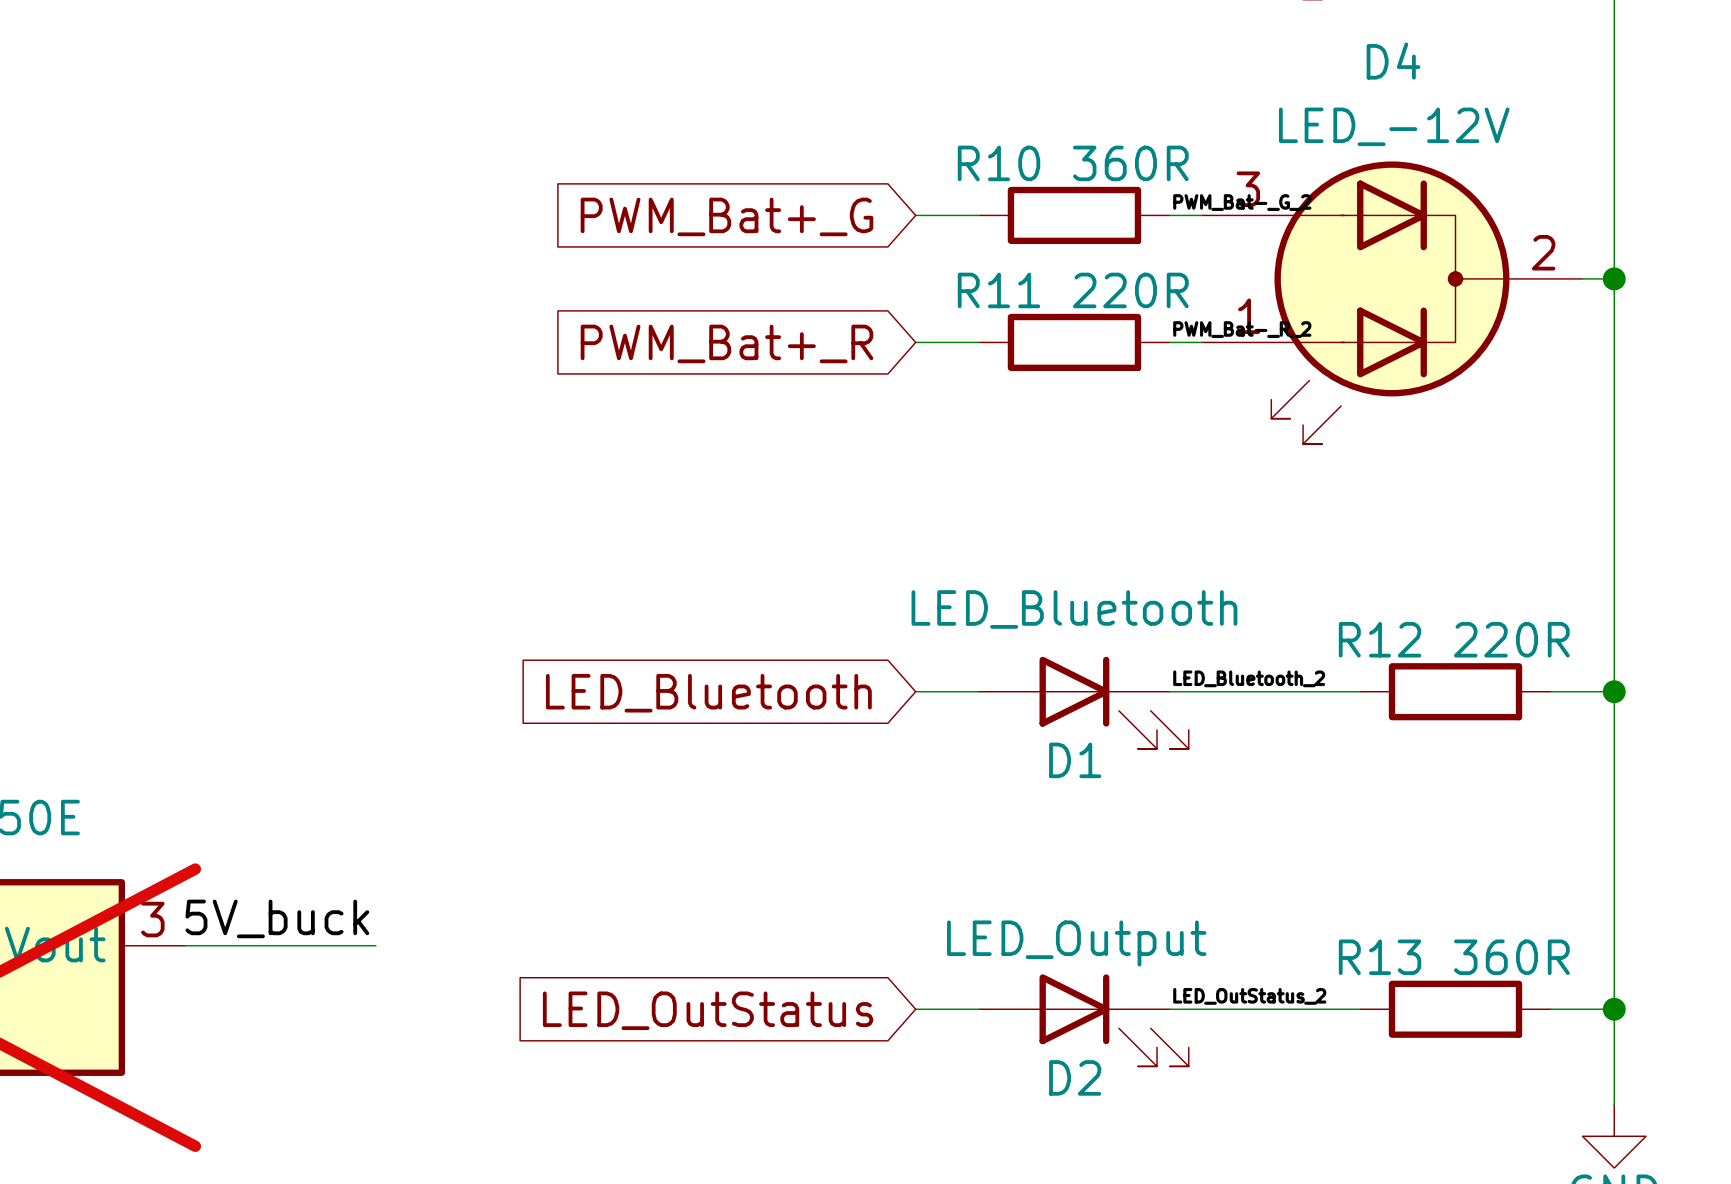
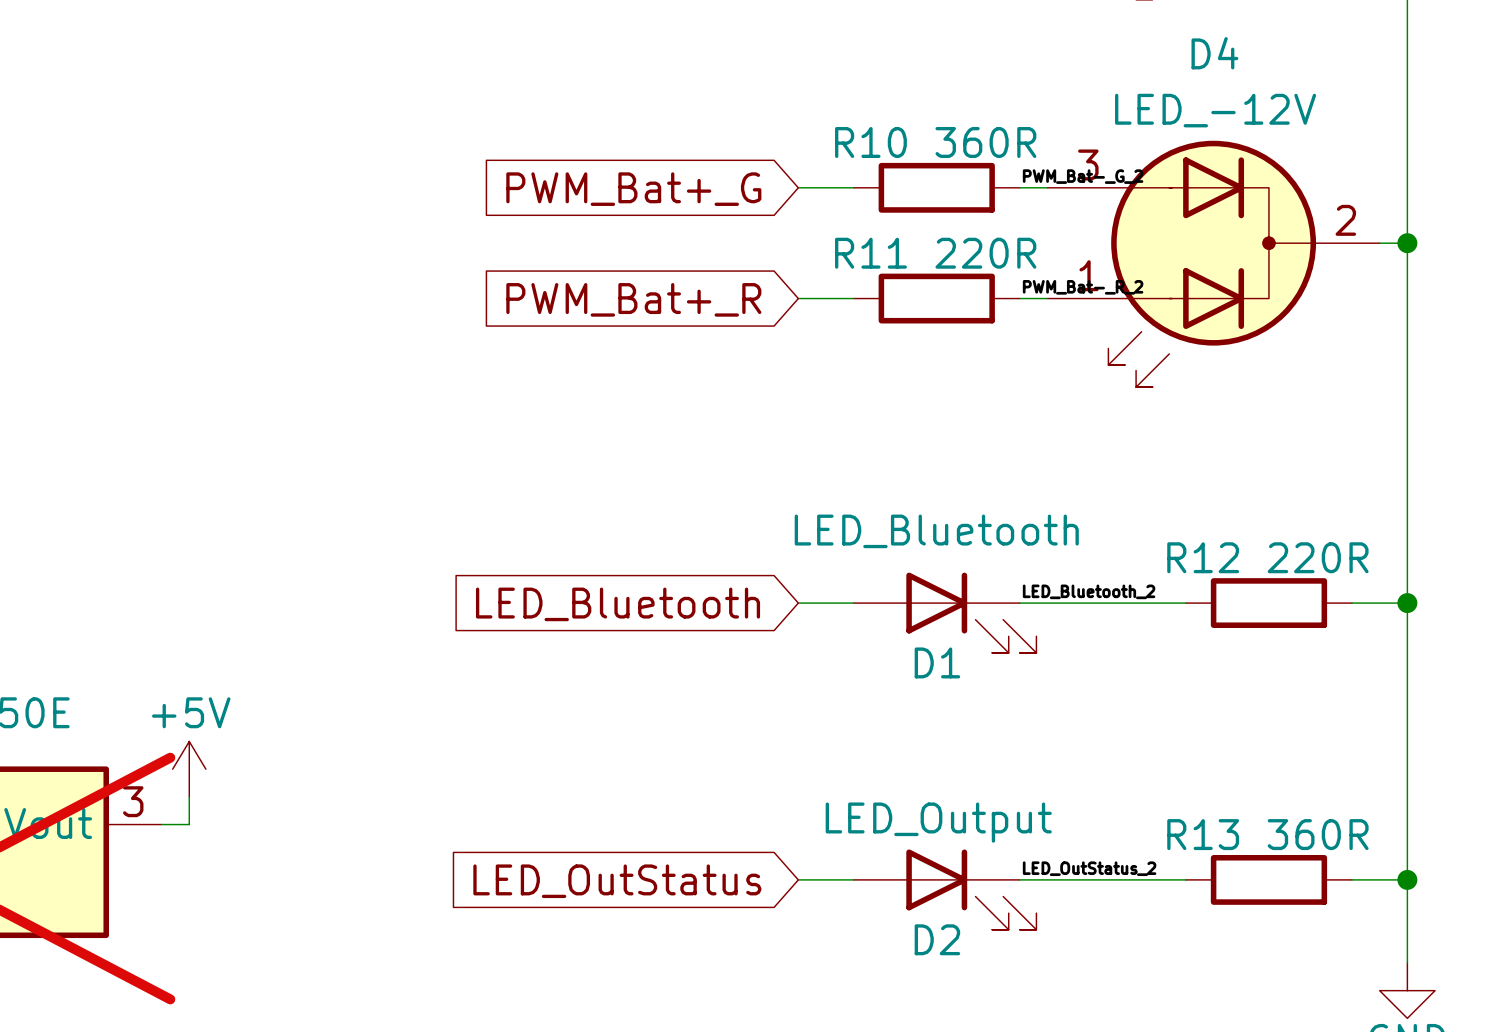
power symbol: none -> +5V (189, 769)
label: 5V_buck (277, 918) -> none
wire: (217, 945) (375, 945) -> (189, 824) (189, 796)

